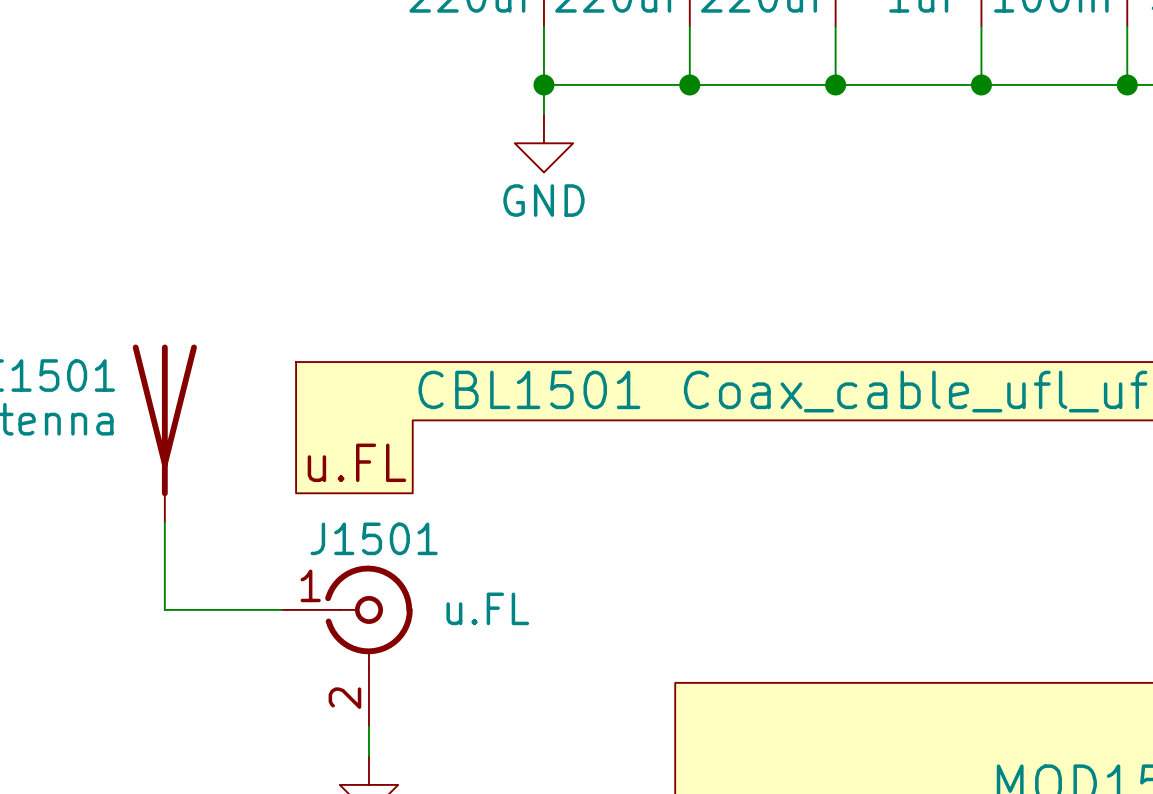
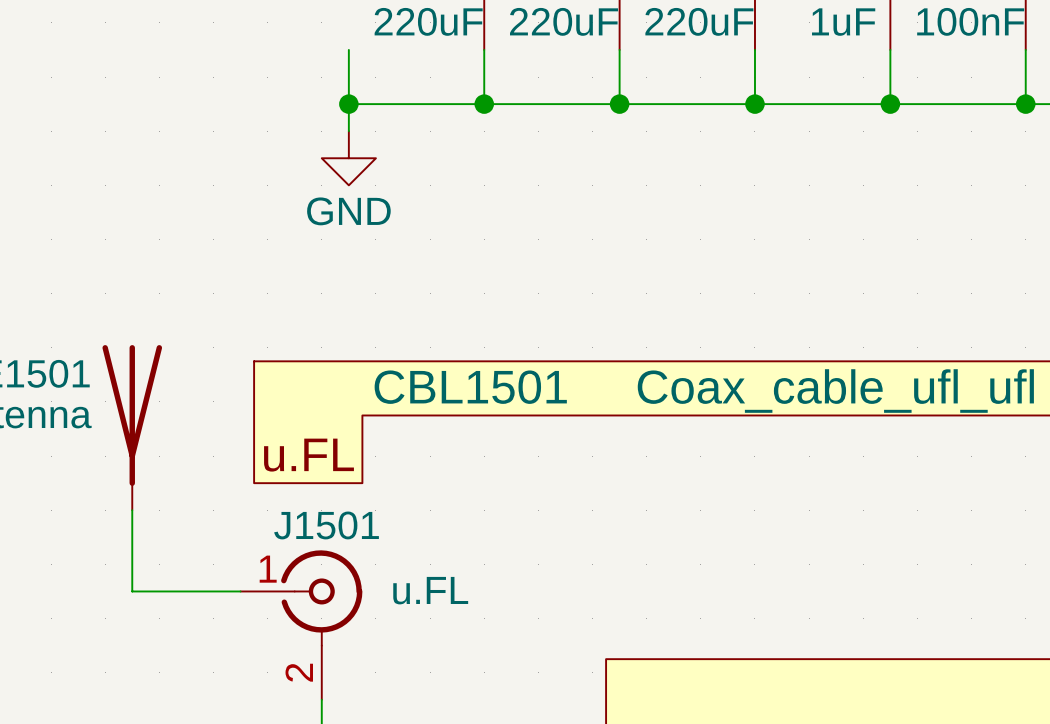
wire: none -> (348, 49) (348, 131)
junction: none -> (348, 104)
wire: (543, 84) (543, 114) -> (484, 104) (348, 104)
power symbol position: GND (543, 143) -> GND (348, 158)

